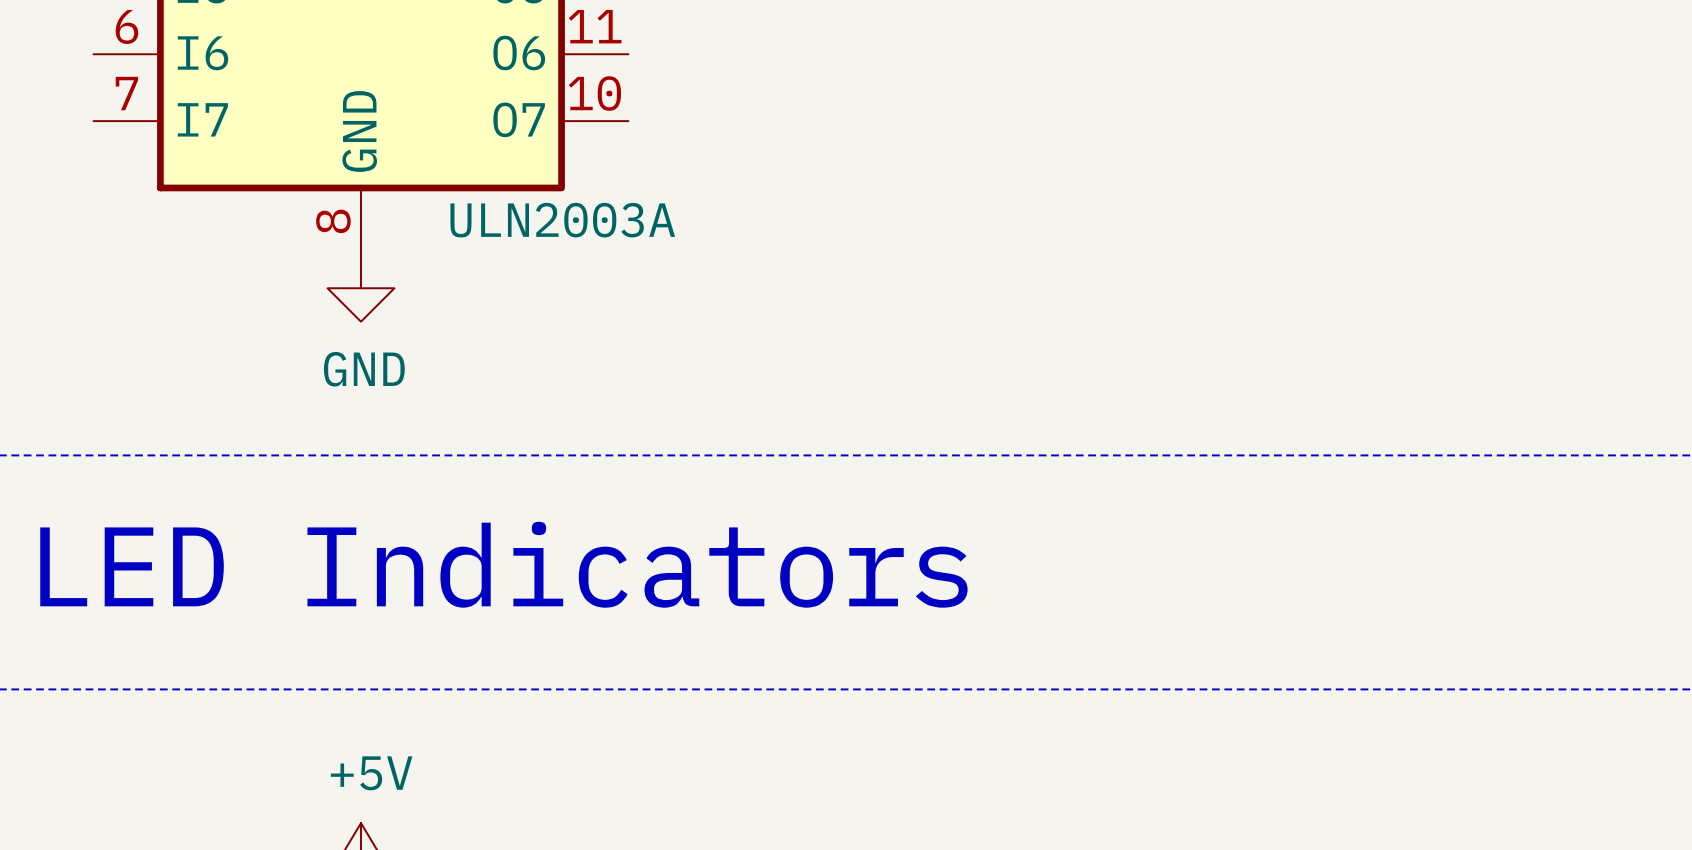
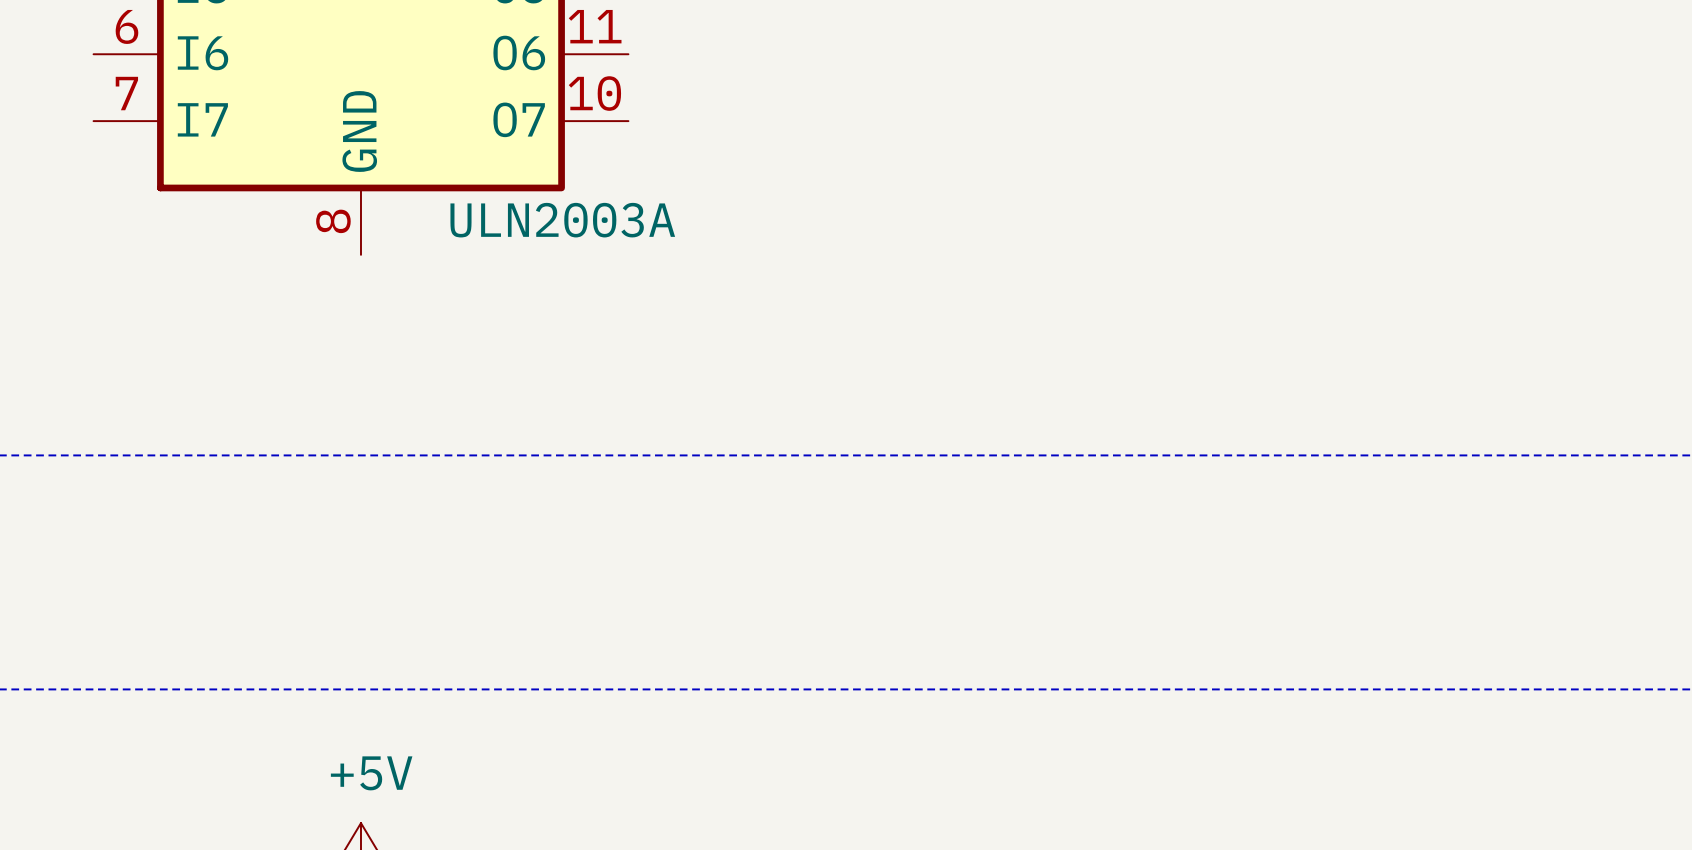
power symbol: GND (360, 288) -> none
text: LED Indicators (503, 564) -> none

